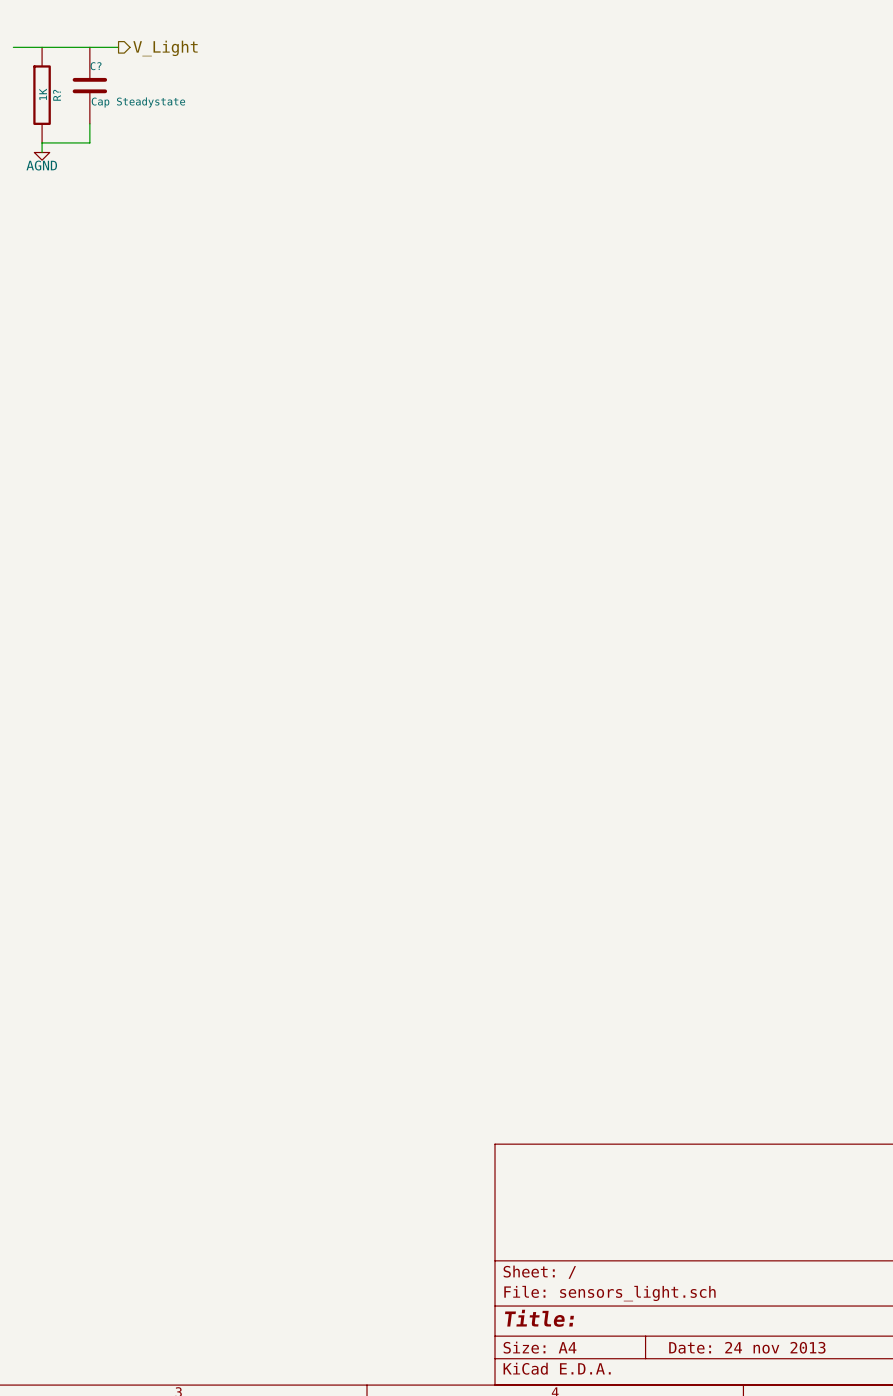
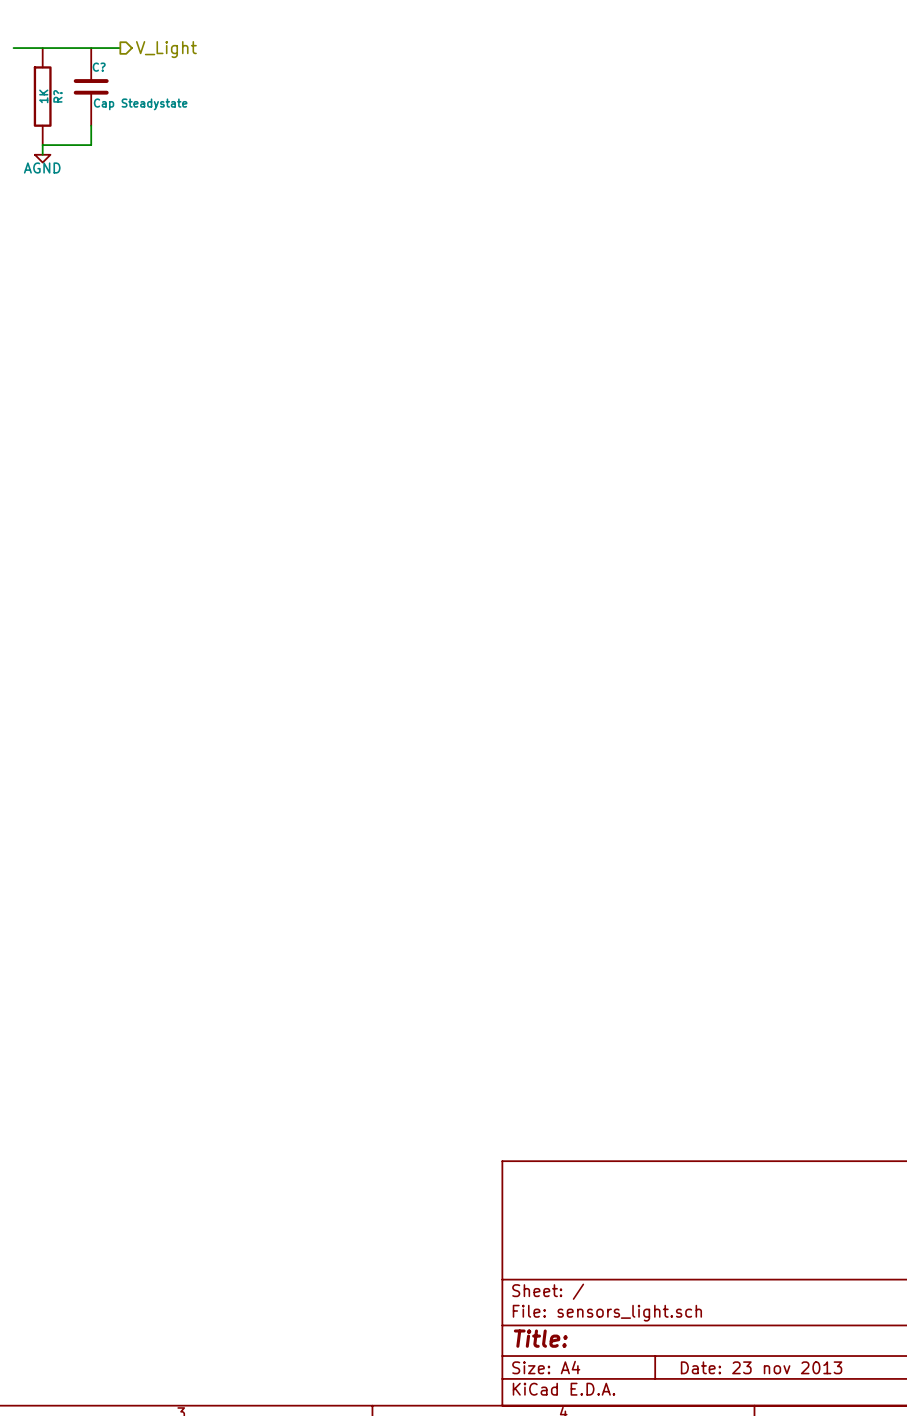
title block: Date: 24 nov 2013 (747, 1347) -> Date: 23 nov 2013 (761, 1367)

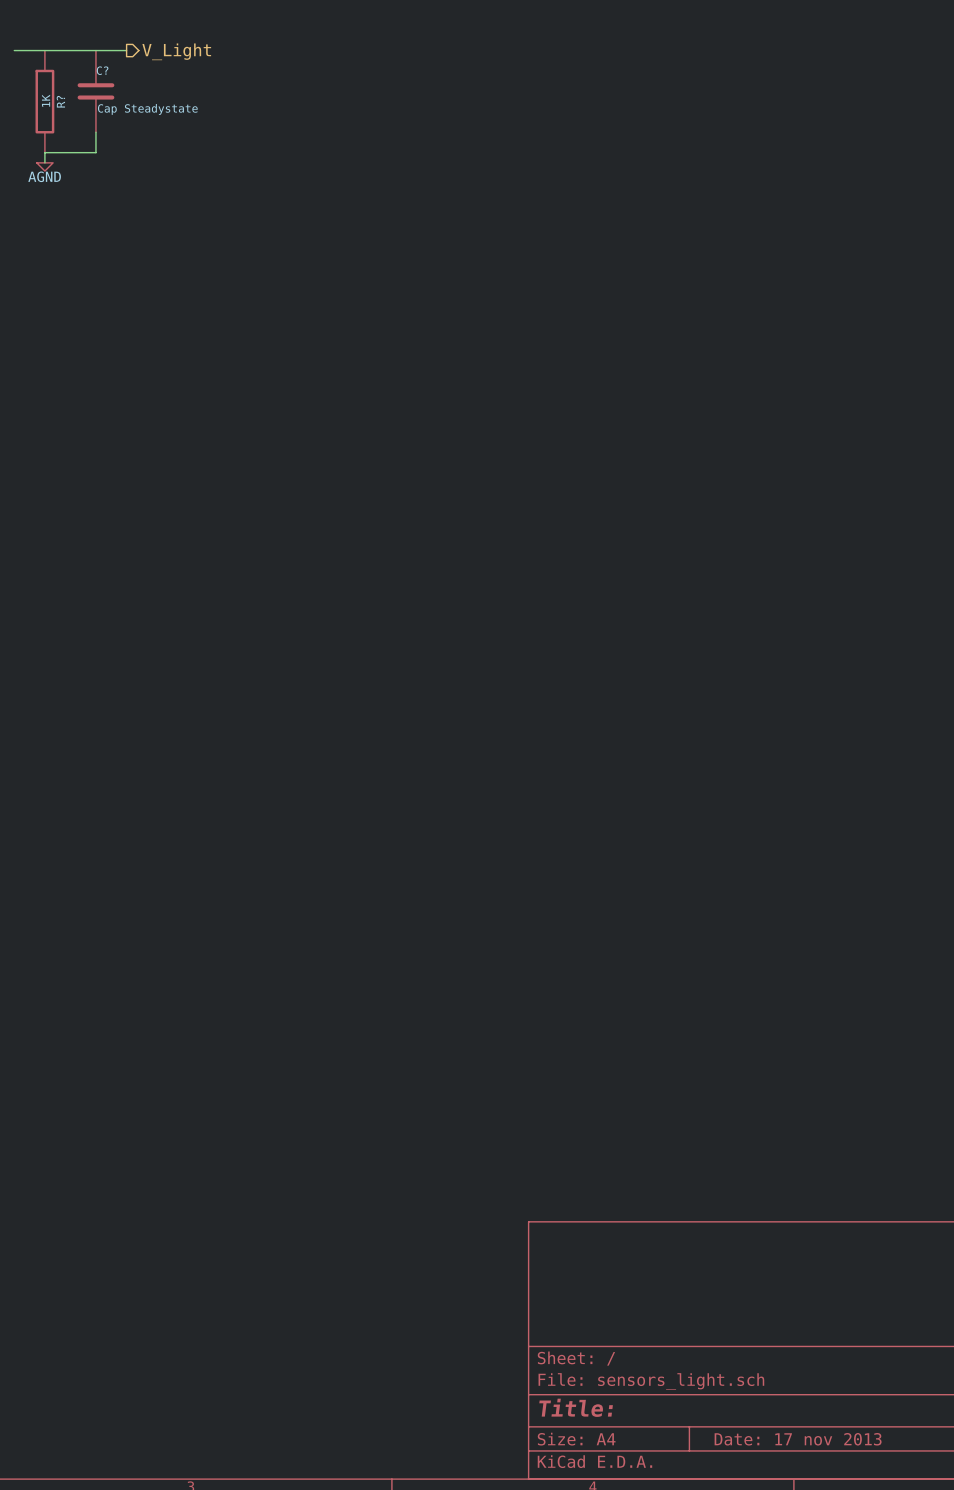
title block: Date: 23 nov 2013 (761, 1367) -> Date: 17 nov 2013 (798, 1439)

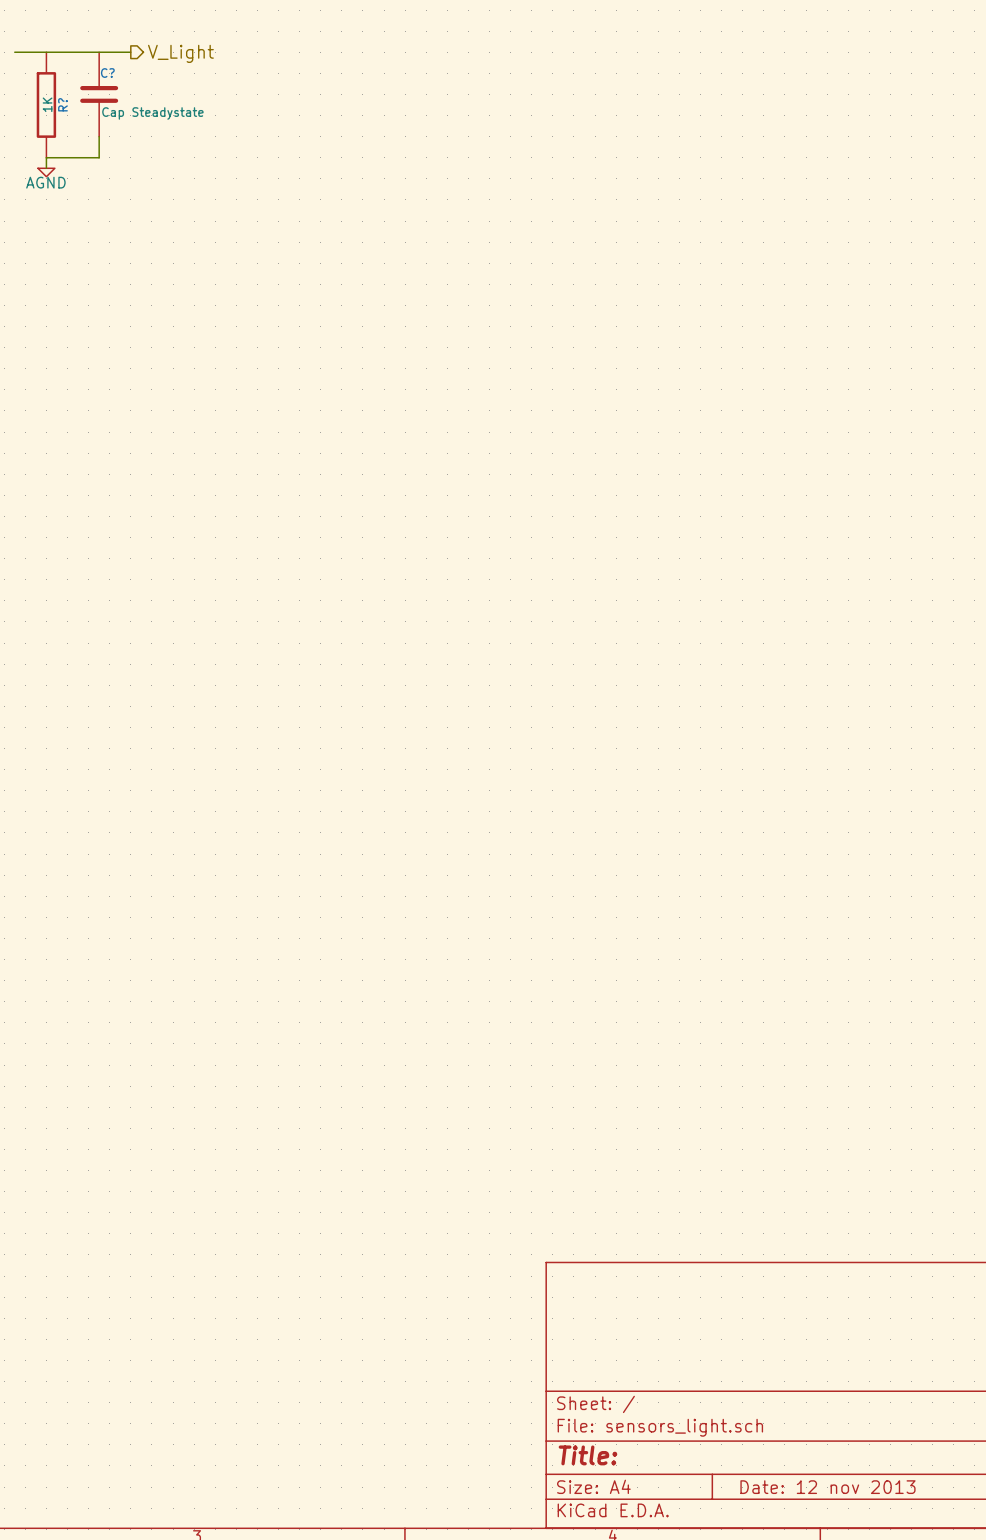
title block: Date: 17 nov 2013 (798, 1439) -> Date: 12 nov 2013 (827, 1487)

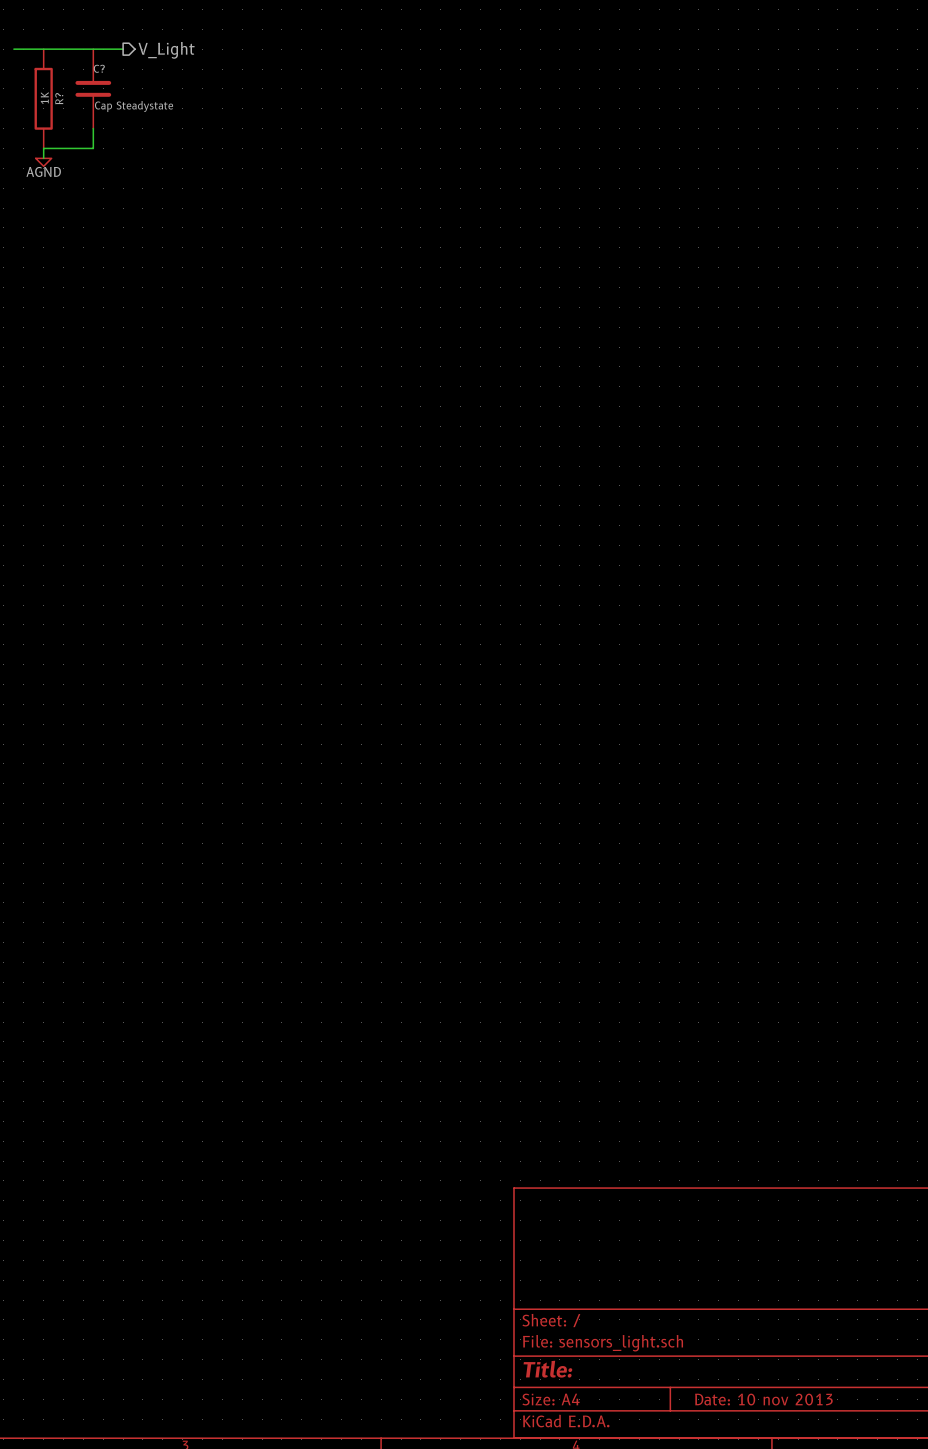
title block: Date: 12 nov 2013 (827, 1487) -> Date: 10 nov 2013 (763, 1399)

